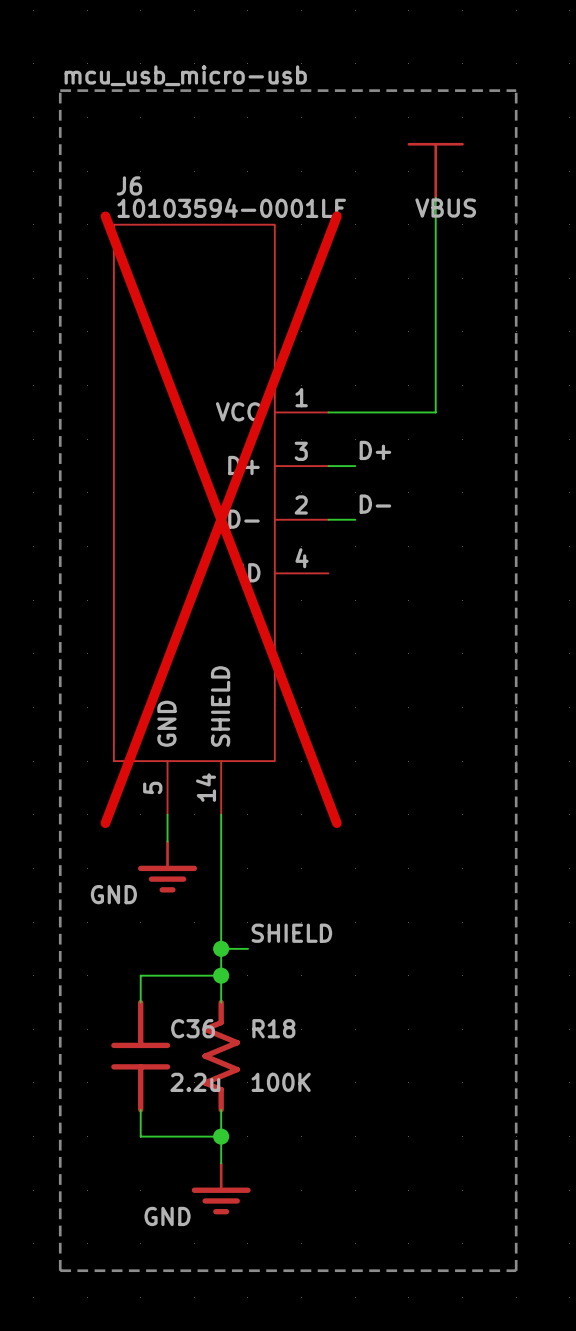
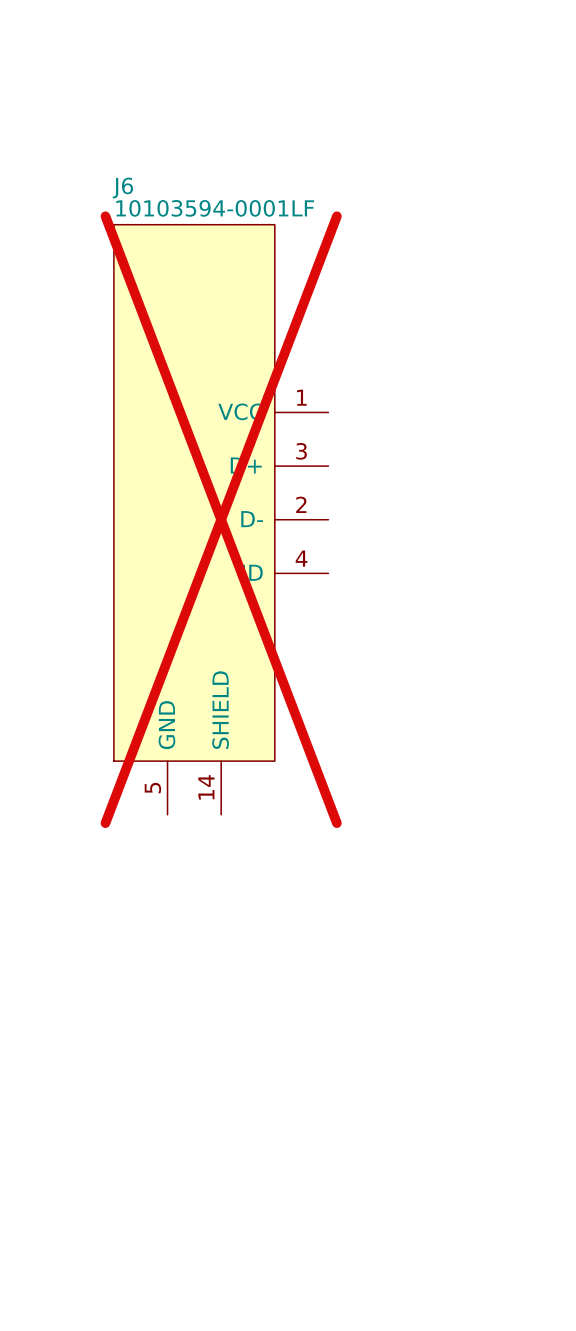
label: mcu_usb_micro-usb (185, 75) -> none
line: (60, 90) (516, 90) (516, 1270) (60, 1270) (60, 90) -> none
power symbol: VBUS (435, 171) -> none
wire: (435, 197) (435, 412) (328, 412) -> none
label: D+ (375, 450) -> none
wire: (328, 466) (355, 466) -> none
label: D- (375, 504) -> none
wire: (328, 519) (355, 519) -> none
wire: (167, 814) (167, 841) -> none
wire: (221, 814) (221, 1002) -> none
power symbol: GND (167, 866) -> none
label: SHIELD (291, 933) -> none
wire: (221, 948) (247, 948) -> none
junction: (221, 948) -> none
wire: (221, 975) (140, 975) (140, 1002) -> none
junction: (221, 975) -> none
C36: 2.2u (140, 1056) -> none
R18: 100K (221, 1056) -> none
wire: (140, 1109) (140, 1136) (221, 1136) -> none
wire: (221, 1109) (221, 1163) -> none
junction: (221, 1136) -> none
power symbol: GND (221, 1188) -> none

